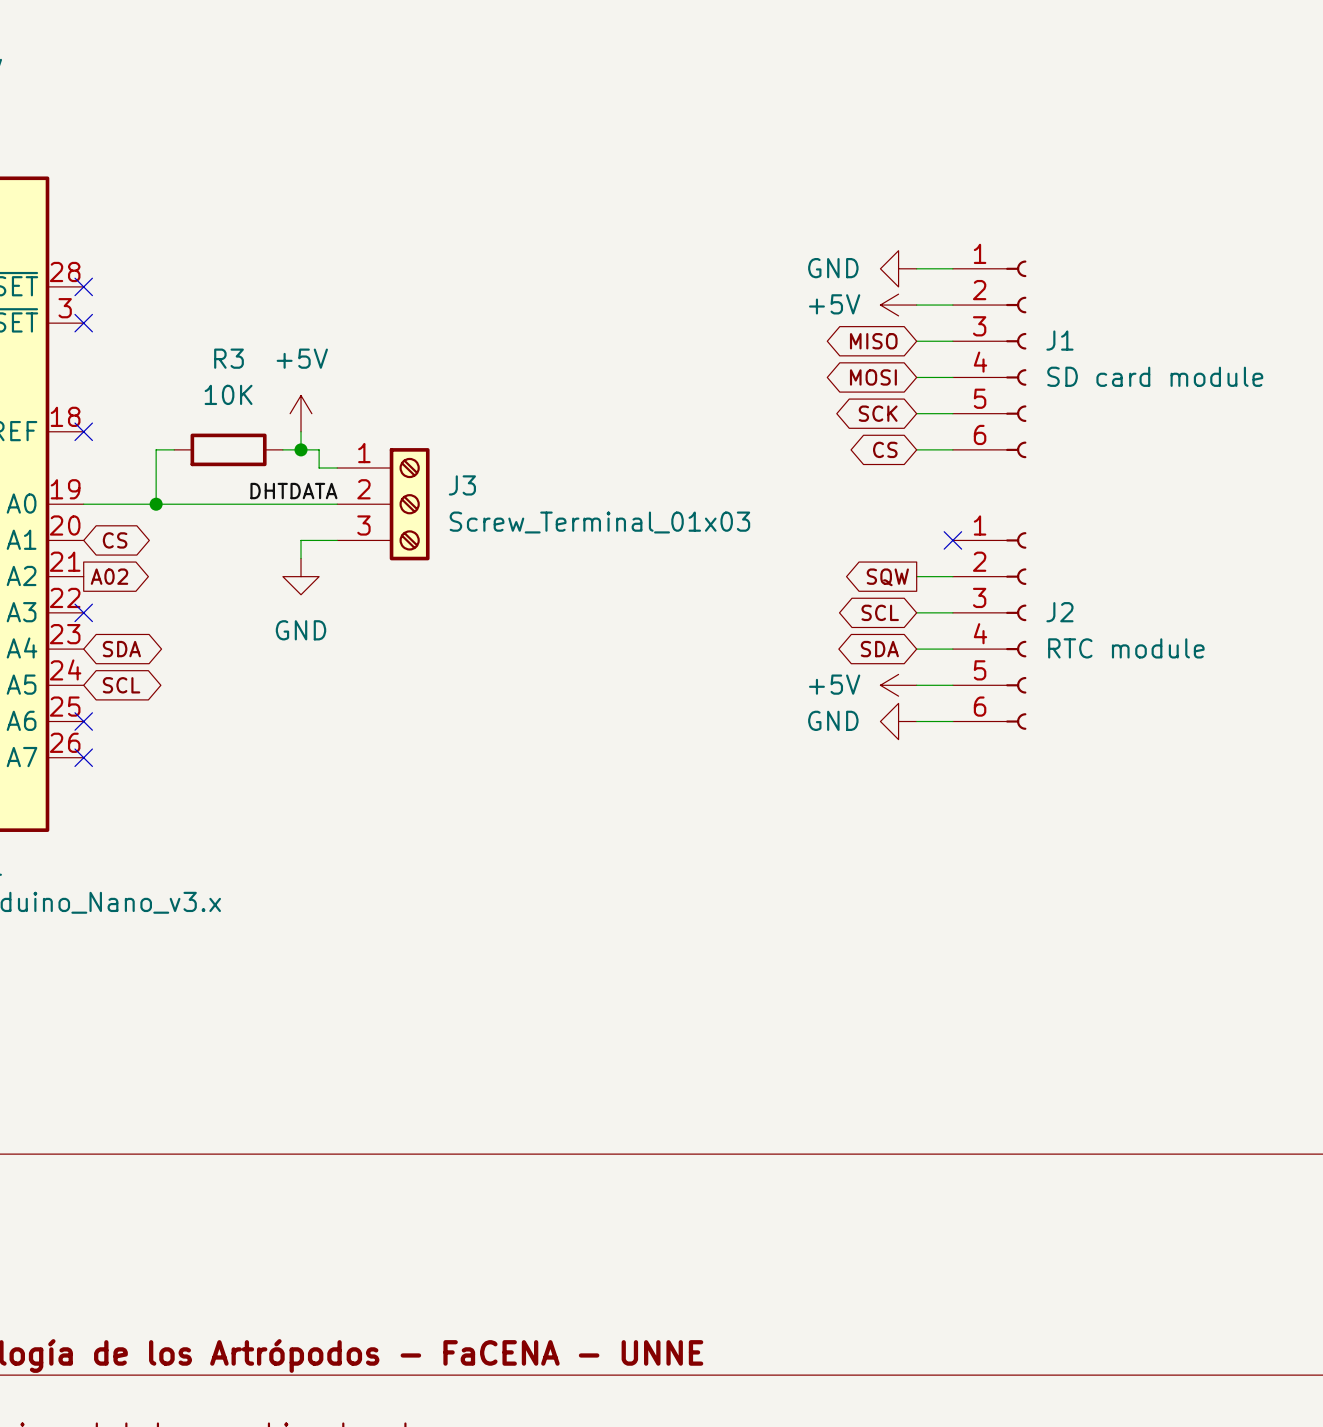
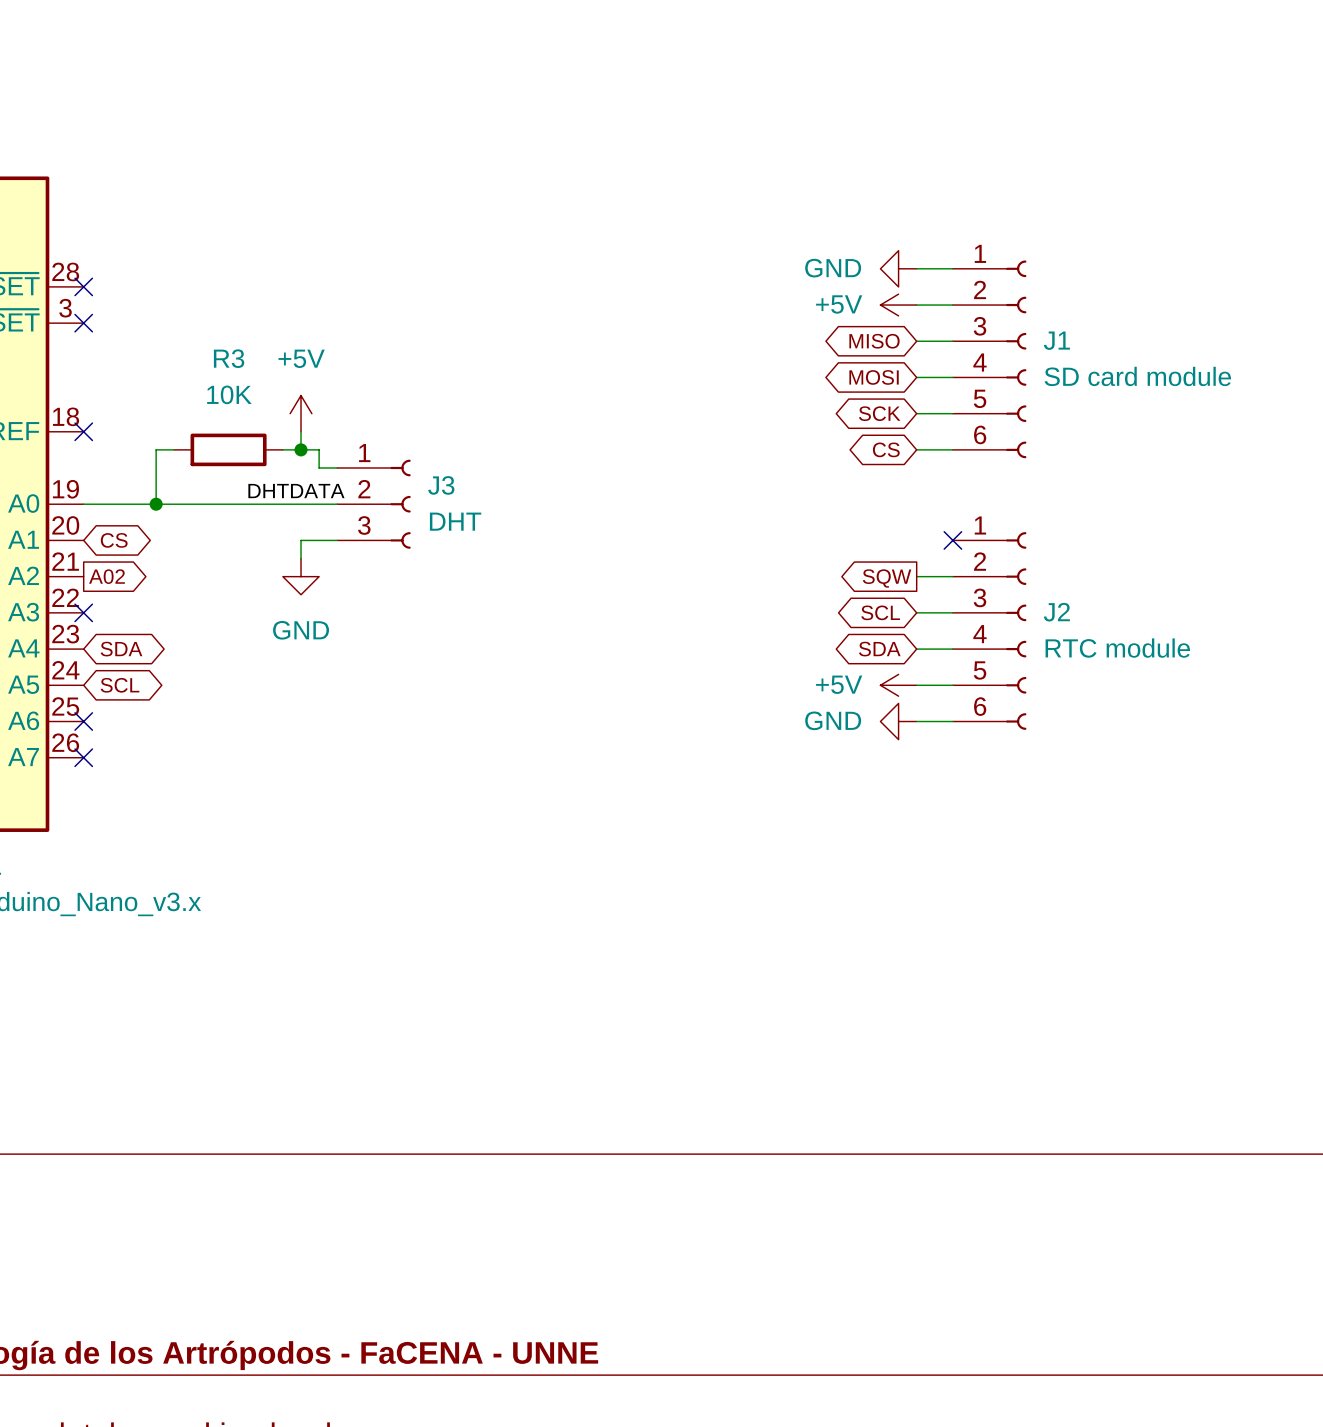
J3 symbol: [337, 448, 430, 561] -> [337, 459, 411, 549]
J3 value: Screw_Terminal_01x03 (599, 522) -> DHT (455, 521)

